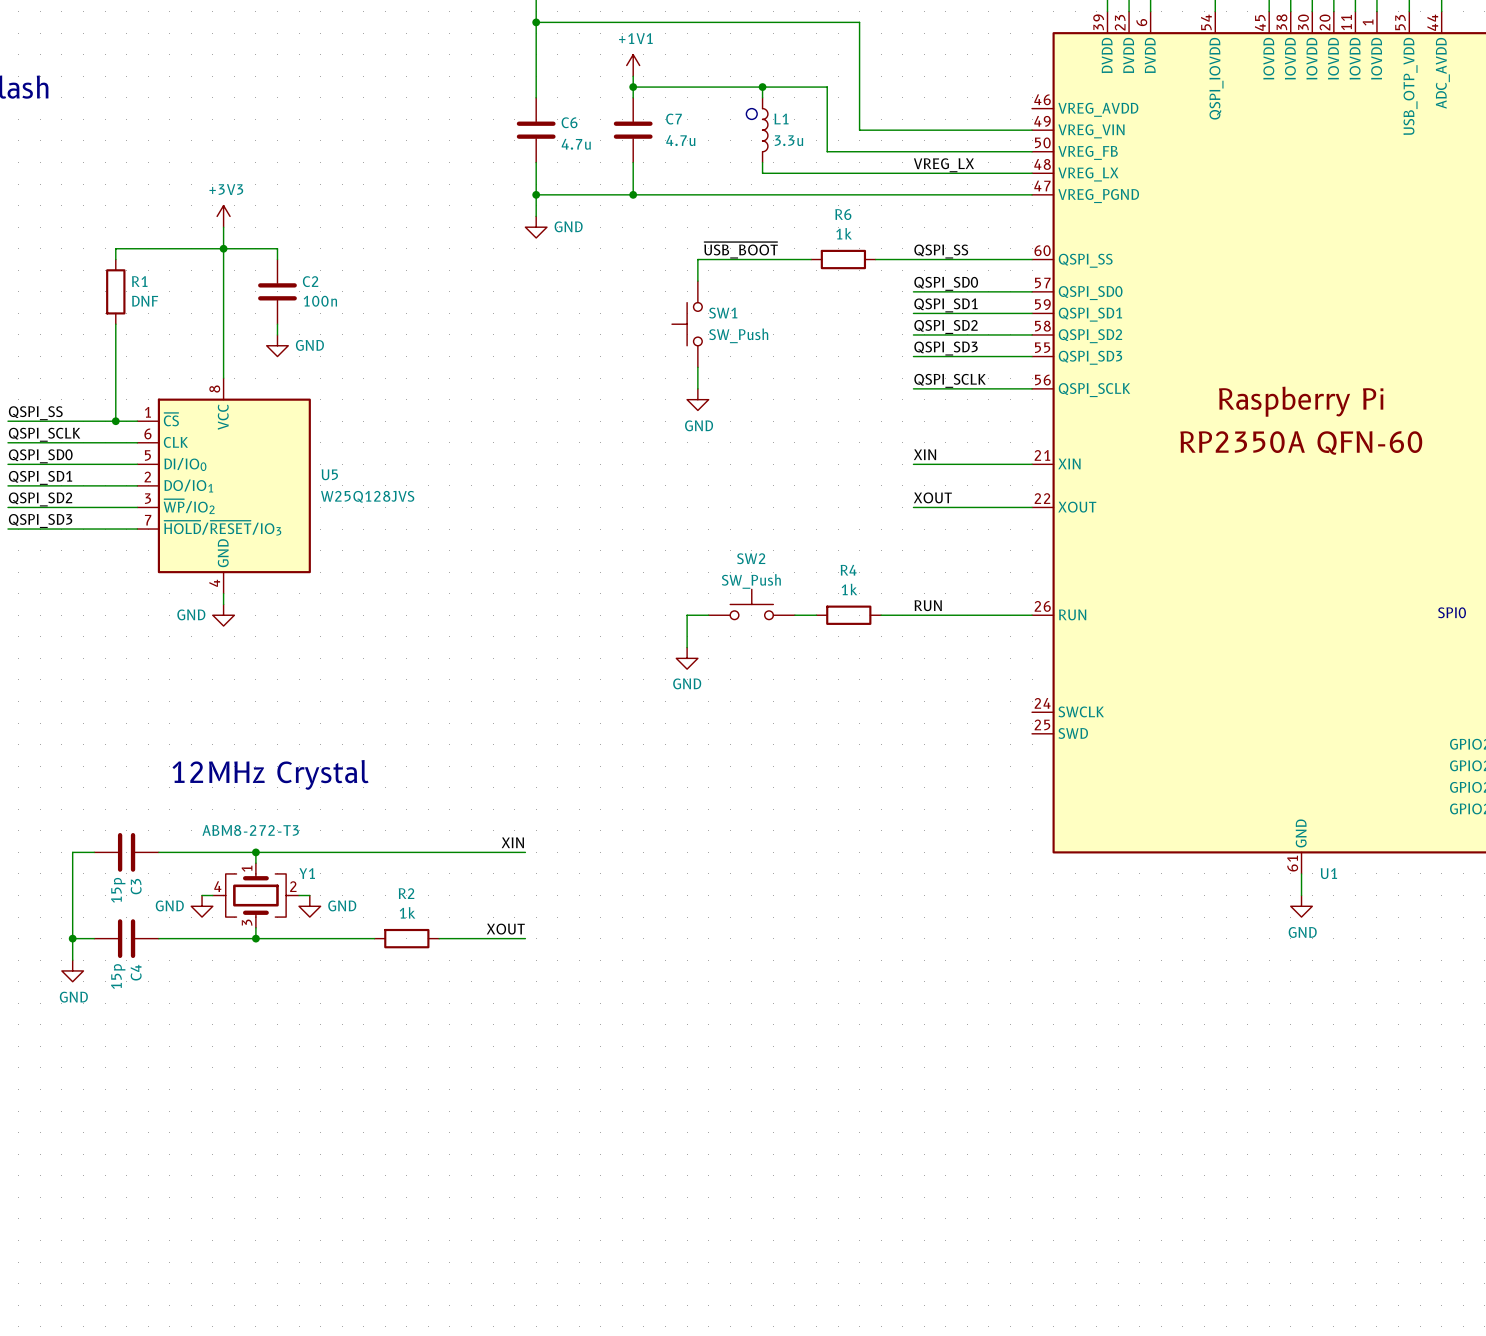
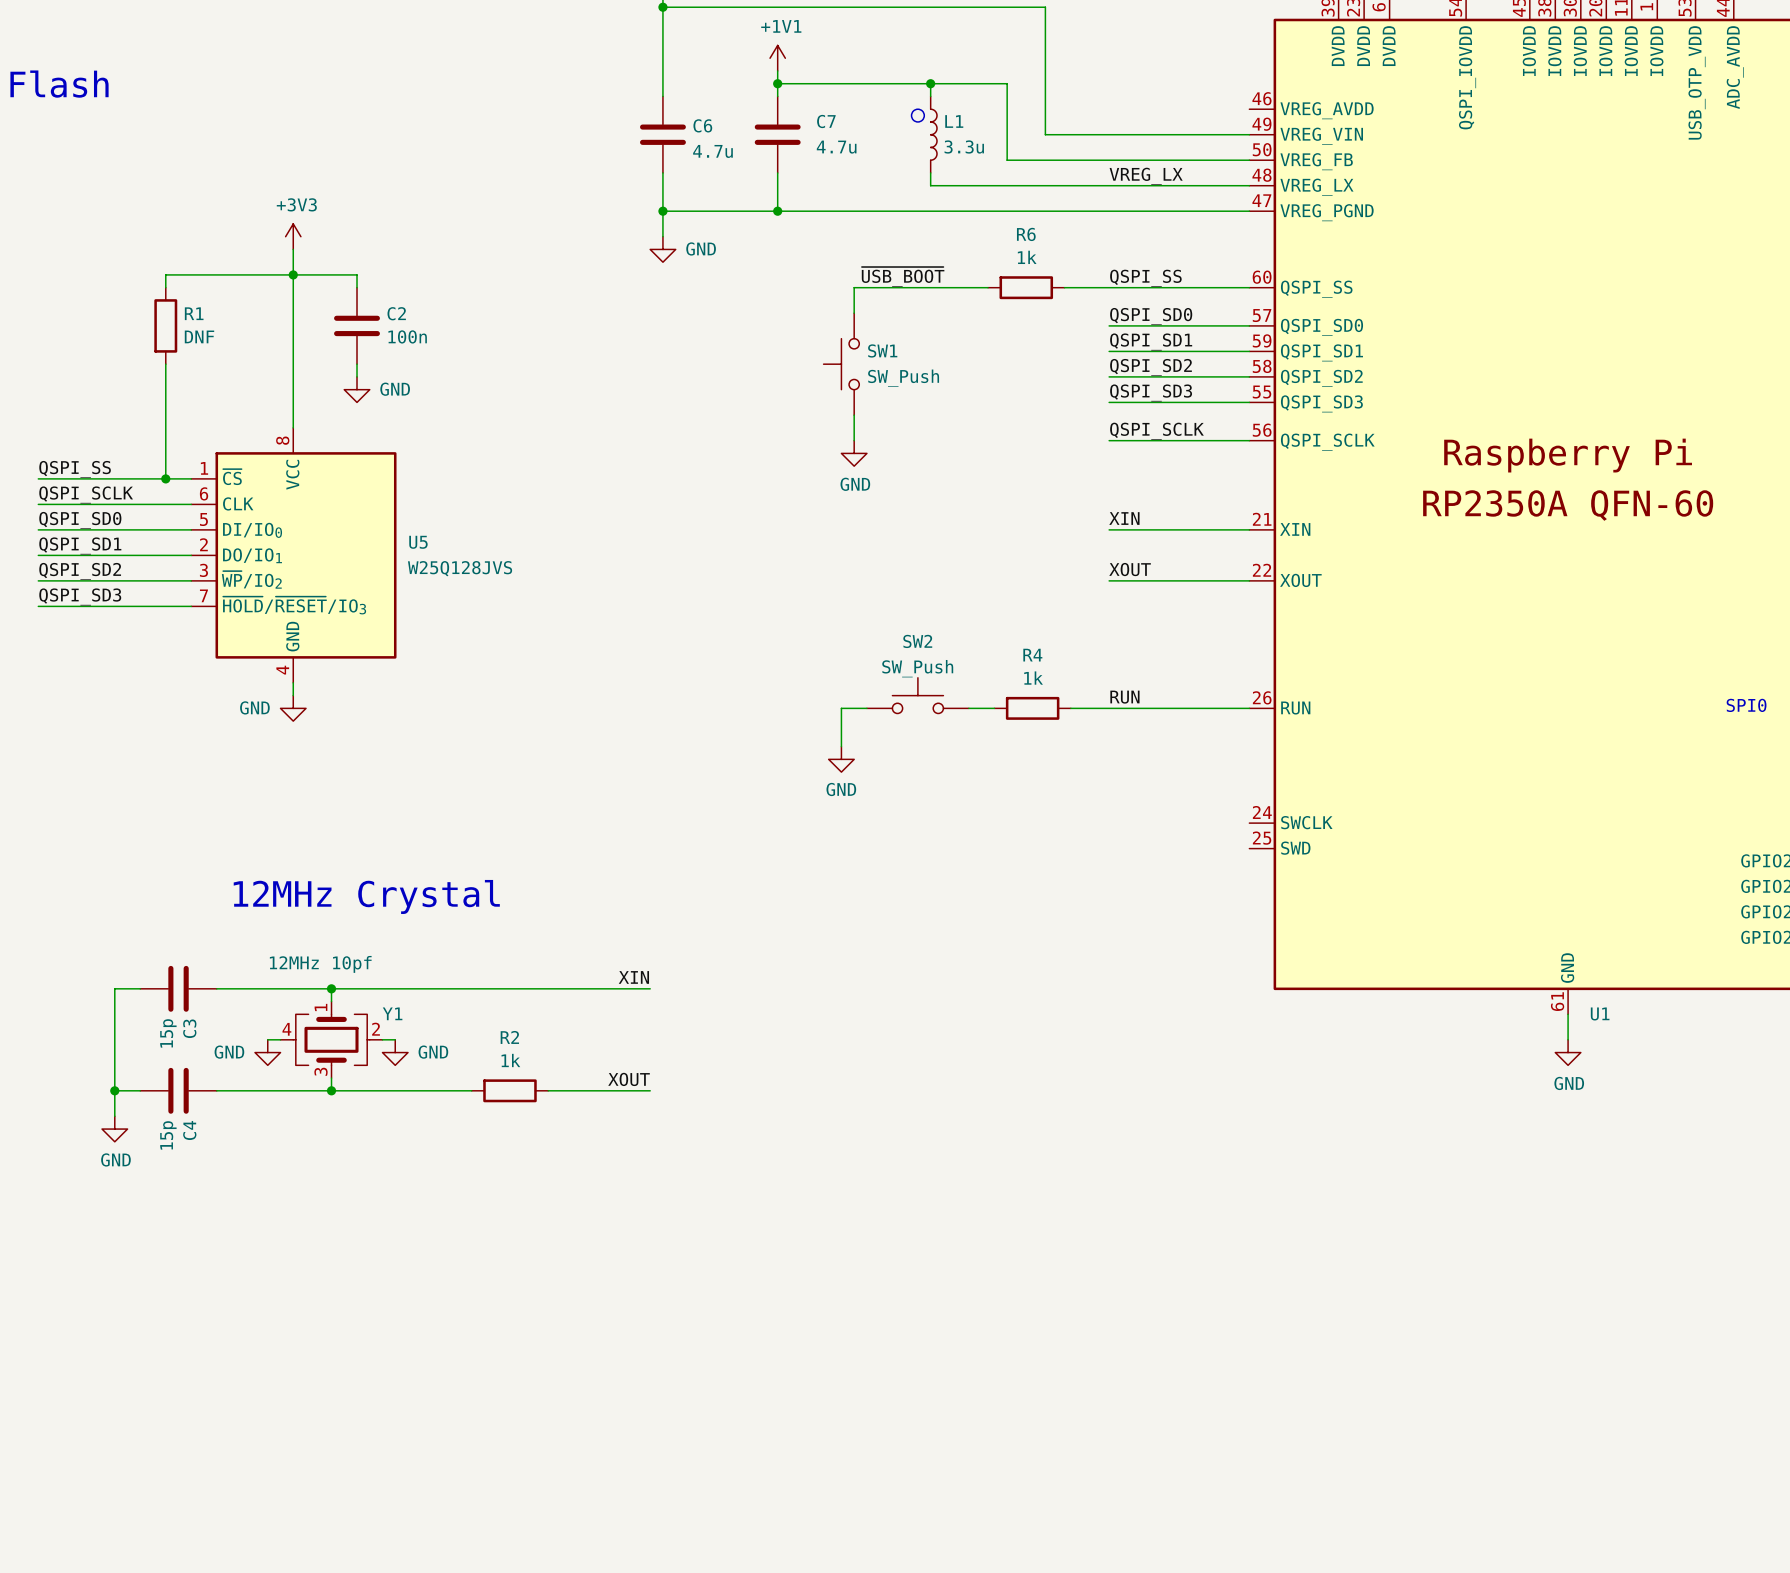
Y1 value: ABM8-272-T3 (250, 830) -> 12MHz 10pf (320, 964)

